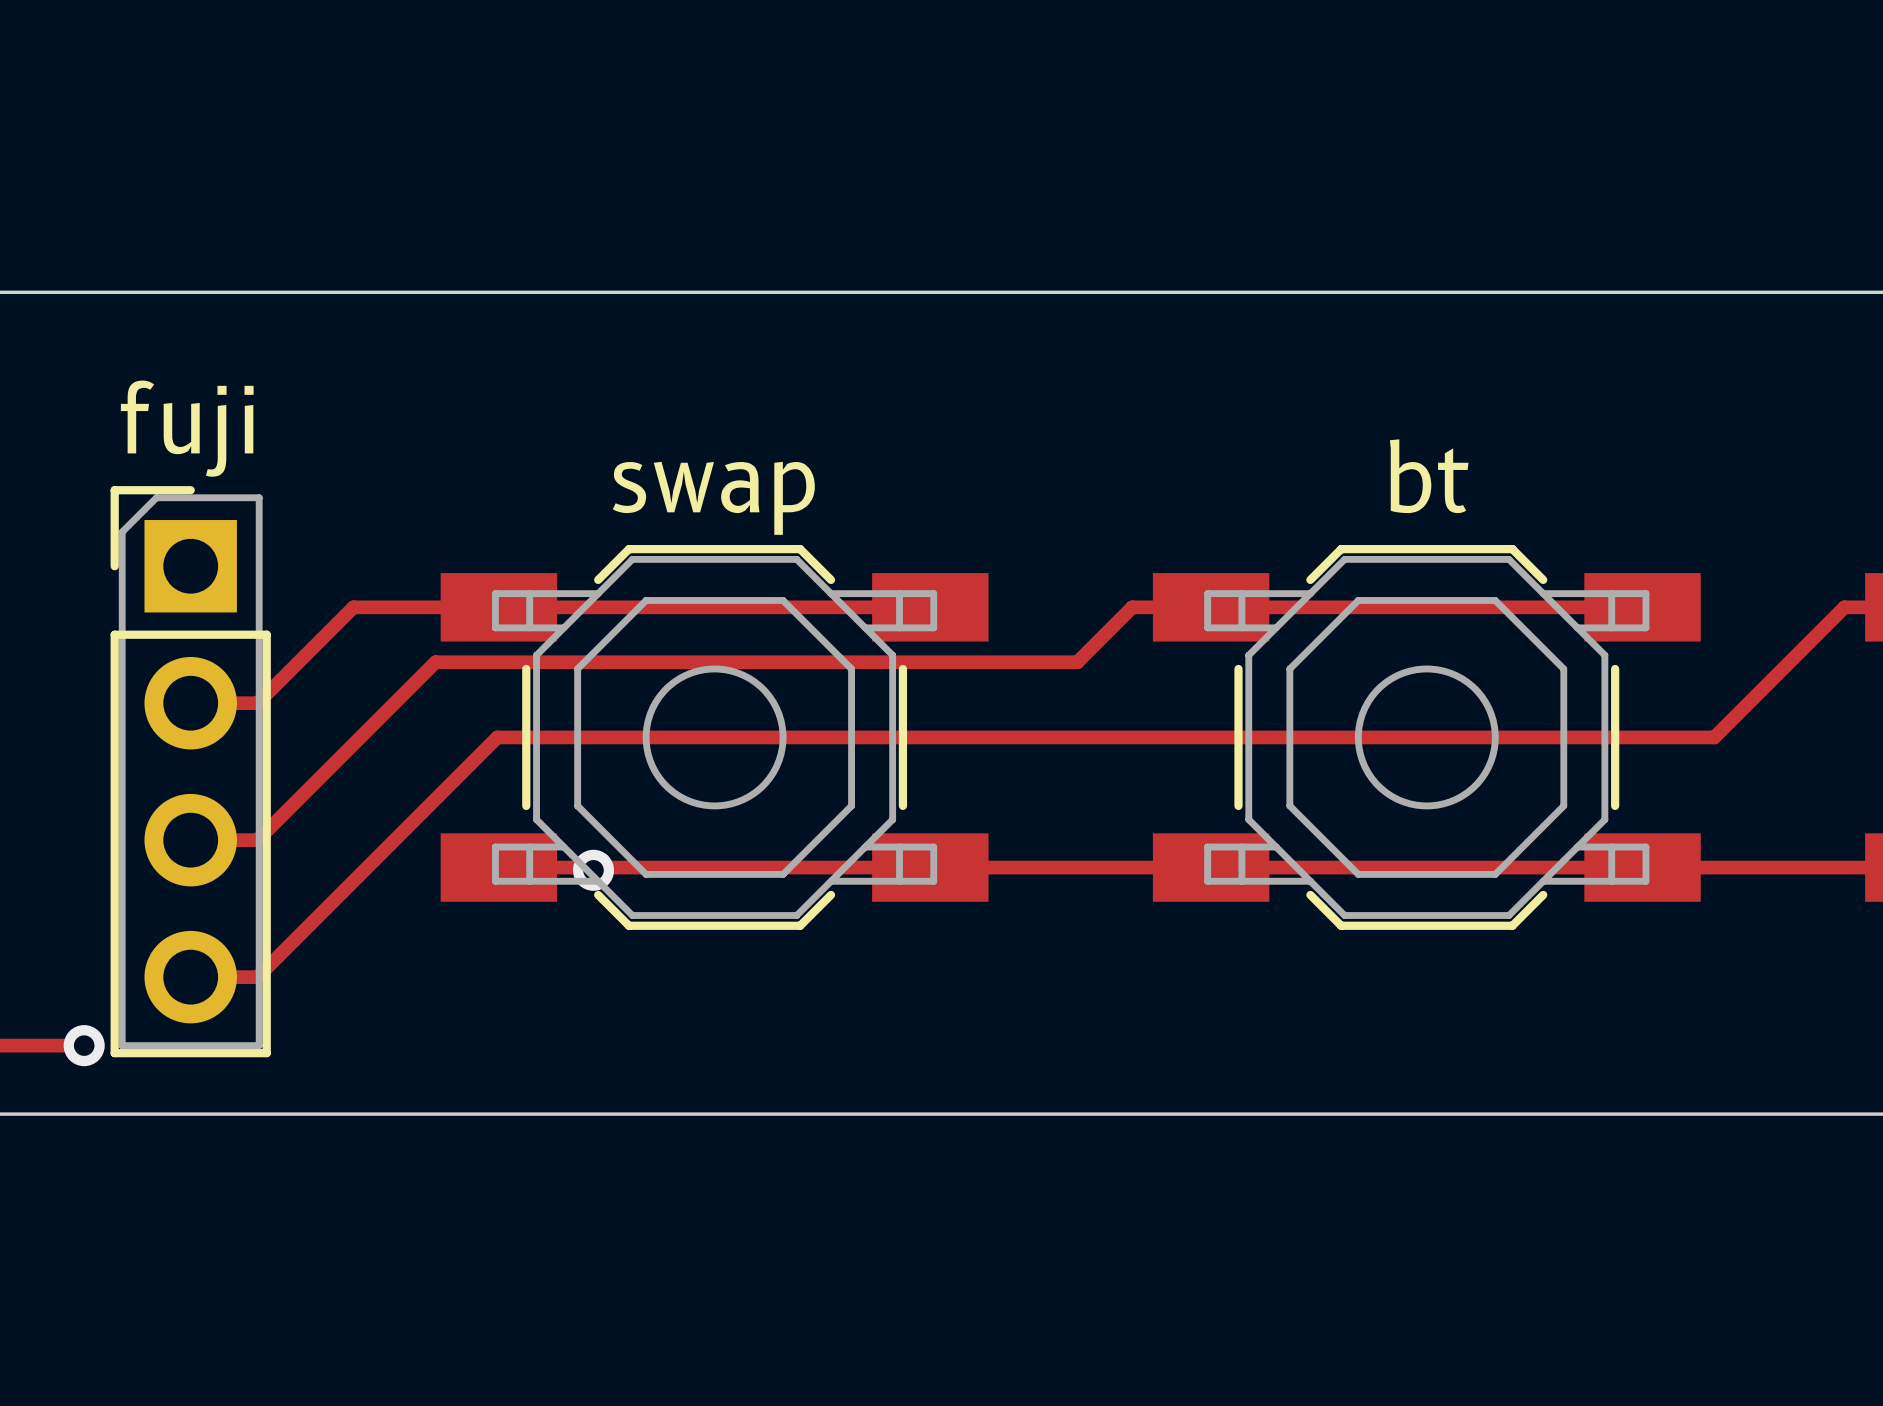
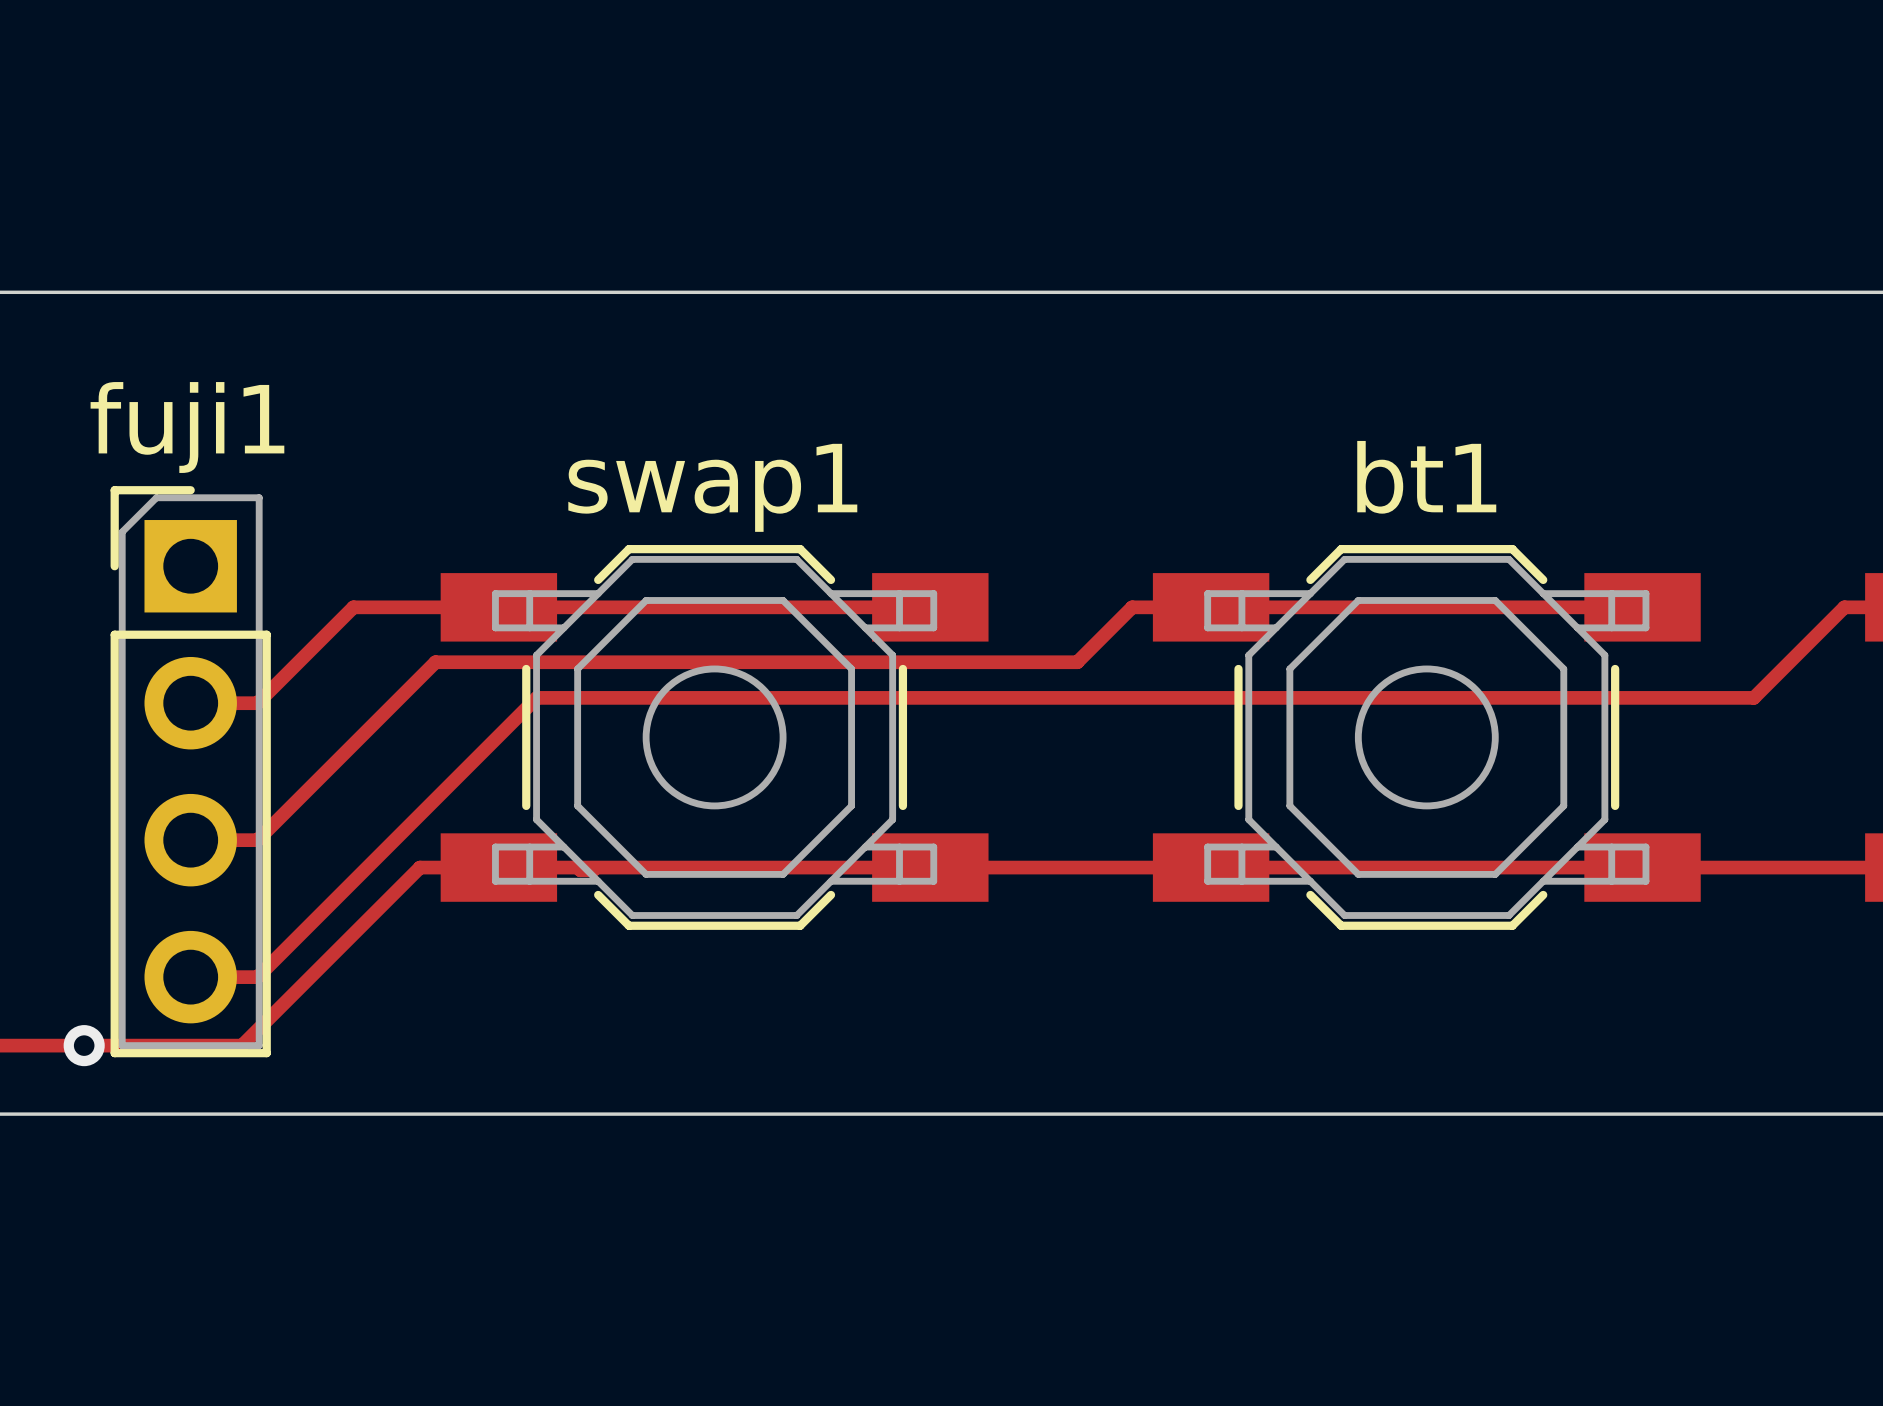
fuji name: fuji (187, 428) -> fuji1 (187, 427)
bt name: bt (1429, 476) -> bt1 (1426, 477)
swap name: swap (713, 498) -> swap1 (712, 487)
track: (1753, 697) (1714, 737) (497, 737) -> (1753, 697) (536, 697) (497, 737)
track: none -> (498, 867) (420, 867) (241, 1045) (84, 1045)
via: (593, 870) -> none

